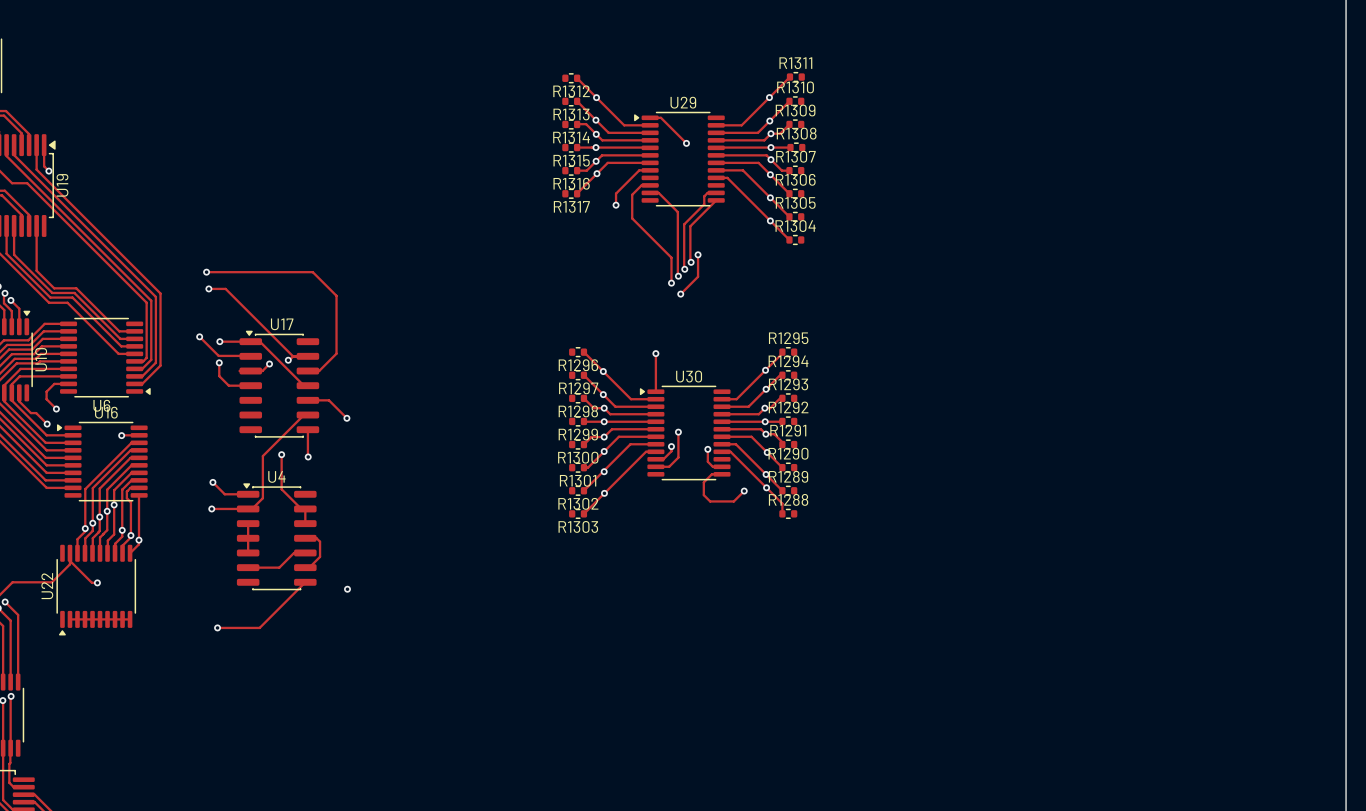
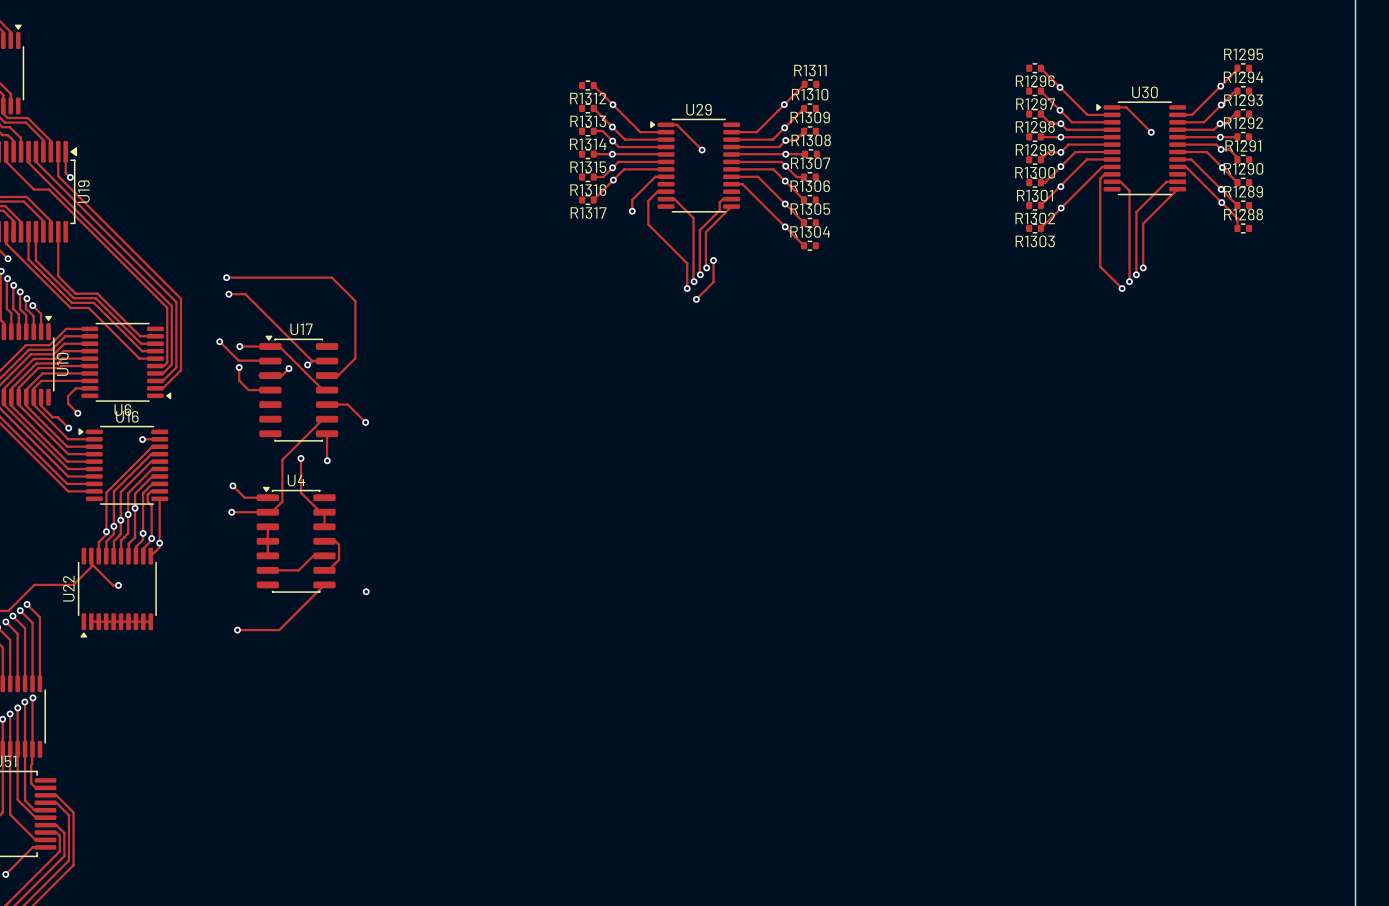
track: none -> (1237, 65) (1237, 69) (1192, 114) (1177, 114)
track: none -> (1040, 68) (1087, 114) (1112, 114)
via: none -> (1220, 86)
via: none -> (1060, 87)
track: none -> (1237, 88) (1203, 122) (1177, 122)
track: none -> (1040, 91) (1072, 122) (1112, 122)
via: none -> (1221, 105)
track: none -> (1112, 107) (1126, 107) (1151, 132)
via: none -> (1060, 110)
track: none -> (1237, 111) (1225, 123) (1220, 123) (1214, 129) (1177, 129)
track: none -> (1040, 114) (1050, 123) (1060, 123) (1066, 129) (1112, 129)
via: none -> (1060, 123)
via: none -> (1220, 123)
via: none -> (1151, 132)
track: none -> (1237, 134) (1234, 137) (1177, 137)
track: none -> (1040, 136) (1112, 137)
via: none -> (1060, 137)
via: none -> (1220, 137)
track: none -> (1112, 144) (1068, 144) (1060, 152) (1048, 152) (1040, 159)
track: none -> (1177, 144) (1216, 144) (1221, 149) (1229, 149) (1237, 157)
via: none -> (1221, 149)
via: none -> (1060, 152)
track: none -> (1112, 152) (1075, 152) (1044, 182) (1040, 182)
track: none -> (1177, 152) (1206, 152) (1237, 182)
track: none -> (1112, 159) (1086, 159) (1040, 205)
track: none -> (1177, 159) (1191, 159) (1237, 205)
via: none -> (1060, 166)
track: none -> (1112, 166) (1102, 166) (1040, 228)
track: none -> (1177, 166) (1186, 166) (1237, 218) (1237, 228)
via: none -> (1222, 167)
track: none -> (1112, 174) (1104, 174) (1100, 178) (1100, 266) (1122, 288)
track: none -> (1112, 181) (1120, 181) (1129, 190) (1129, 281)
track: none -> (1177, 181) (1166, 181) (1136, 212) (1136, 274)
via: none -> (1060, 186)
track: none -> (1177, 189) (1143, 223) (1143, 267)
via: none -> (1221, 189)
via: none -> (1221, 202)
via: none -> (1061, 208)
via: none -> (1143, 267)
via: none -> (1136, 274)
via: none -> (1129, 281)
via: none -> (1122, 288)
track: (782, 349) (782, 353) (736, 399) (722, 399) -> none
R1296 position: (578, 352) -> (1034, 68)
track: (583, 352) (631, 399) (655, 399) -> none
R1295 position: (788, 352) -> (1243, 68)
track: (655, 353) (655, 391) -> none
via: (655, 353) -> none
via: (765, 370) -> none
via: (603, 371) -> none
track: (782, 372) (748, 406) (722, 406) -> none
R1297 position: (578, 375) -> (1034, 91)
track: (583, 375) (615, 406) (655, 406) -> none
R1294 position: (788, 375) -> (1243, 91)
via: (766, 389) -> none
via: (603, 394) -> none
track: (782, 396) (770, 408) (764, 408) (758, 414) (722, 414) -> none
R1298 position: (578, 398) -> (1034, 114)
track: (583, 398) (593, 408) (604, 408) (610, 414) (655, 414) -> none
R1293 position: (788, 398) -> (1243, 114)
via: (604, 408) -> none
via: (764, 408) -> none
track: (782, 419) (779, 421) (722, 421) -> none
R1299 position: (578, 421) -> (1034, 136)
track: (583, 421) (655, 421) -> none
via: (604, 421) -> none
via: (765, 421) -> none
R1292 position: (788, 421) -> (1243, 136)
track: (655, 429) (612, 429) (604, 437) (591, 437) (583, 444) -> none
track: (722, 429) (761, 429) (765, 434) (774, 434) (782, 442) -> none
track: (678, 432) (678, 457) (669, 466) (655, 466) -> none
via: (678, 432) -> none
U30 position: (685, 433) -> (1141, 148)
via: (765, 434) -> none
track: (655, 436) (618, 436) (588, 467) (583, 467) -> none
track: (722, 436) (751, 436) (782, 467) -> none
via: (604, 437) -> none
R1300 position: (578, 444) -> (1034, 159)
track: (655, 444) (630, 444) (583, 490) -> none
track: (722, 444) (735, 444) (782, 490) -> none
R1291 position: (788, 444) -> (1243, 159)
track: (671, 446) (671, 451) (663, 459) (655, 459) -> none
via: (671, 446) -> none
track: (707, 449) (707, 461) (712, 466) (722, 466) -> none
via: (707, 449) -> none
via: (604, 451) -> none
track: (655, 451) (646, 451) (583, 513) -> none
track: (722, 451) (730, 451) (782, 503) (782, 513) -> none
via: (767, 452) -> none
R1301 position: (578, 467) -> (1034, 182)
R1290 position: (788, 467) -> (1243, 182)
via: (604, 471) -> none
track: (722, 474) (711, 474) (703, 482) (703, 495) (710, 501) (733, 501) (744, 491) -> none
via: (766, 474) -> none
via: (766, 487) -> none
R1302 position: (578, 490) -> (1034, 205)
R1289 position: (788, 490) -> (1243, 205)
via: (744, 491) -> none
via: (604, 493) -> none
R1303 position: (578, 513) -> (1034, 228)
R1288 position: (788, 513) -> (1243, 228)

